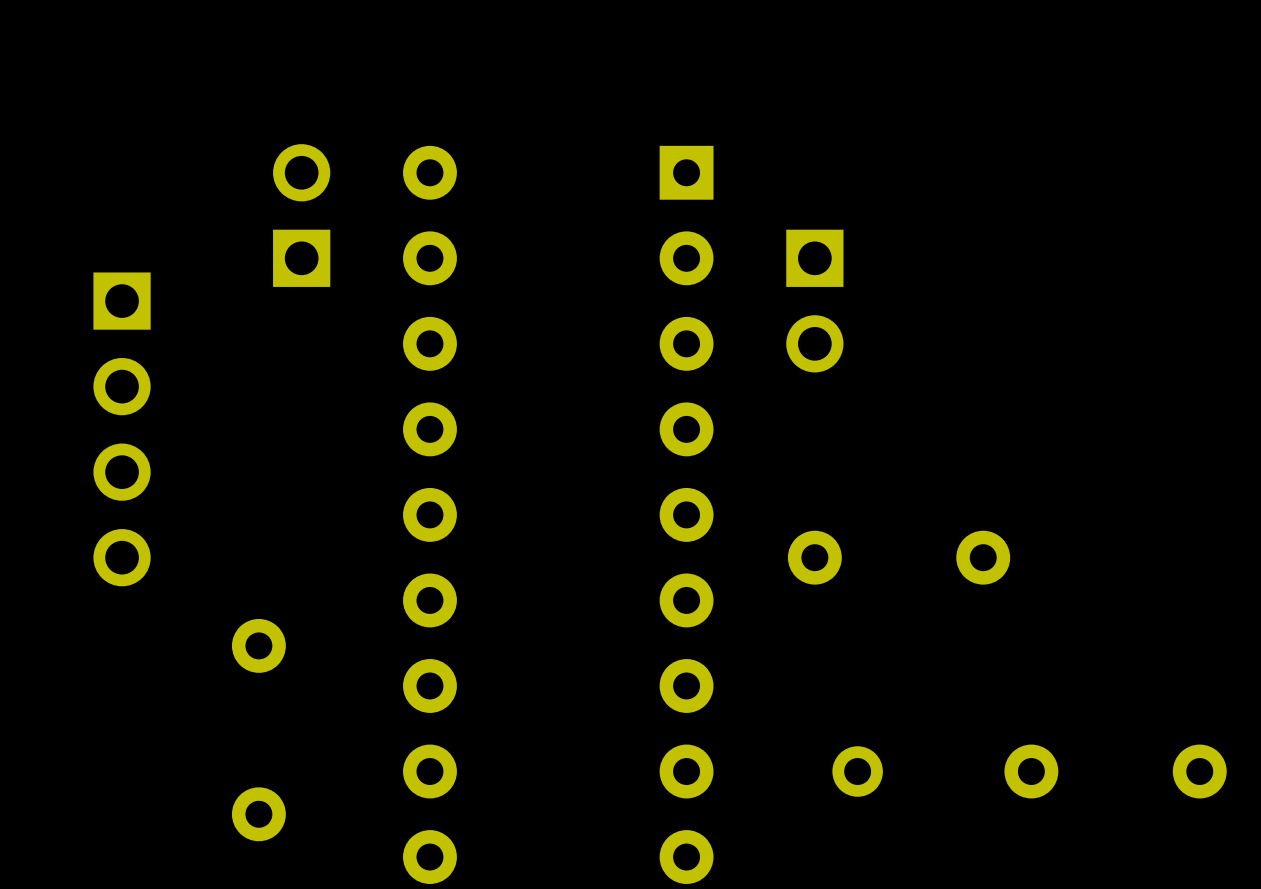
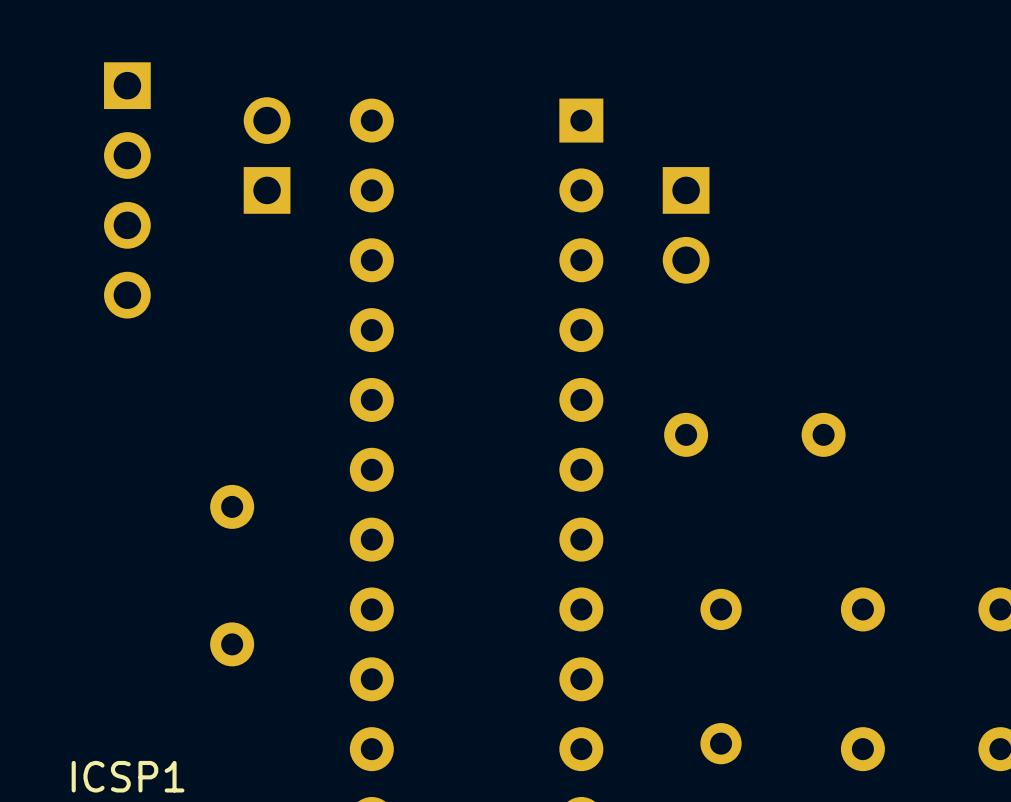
part position: (122, 429) -> (127, 190)

